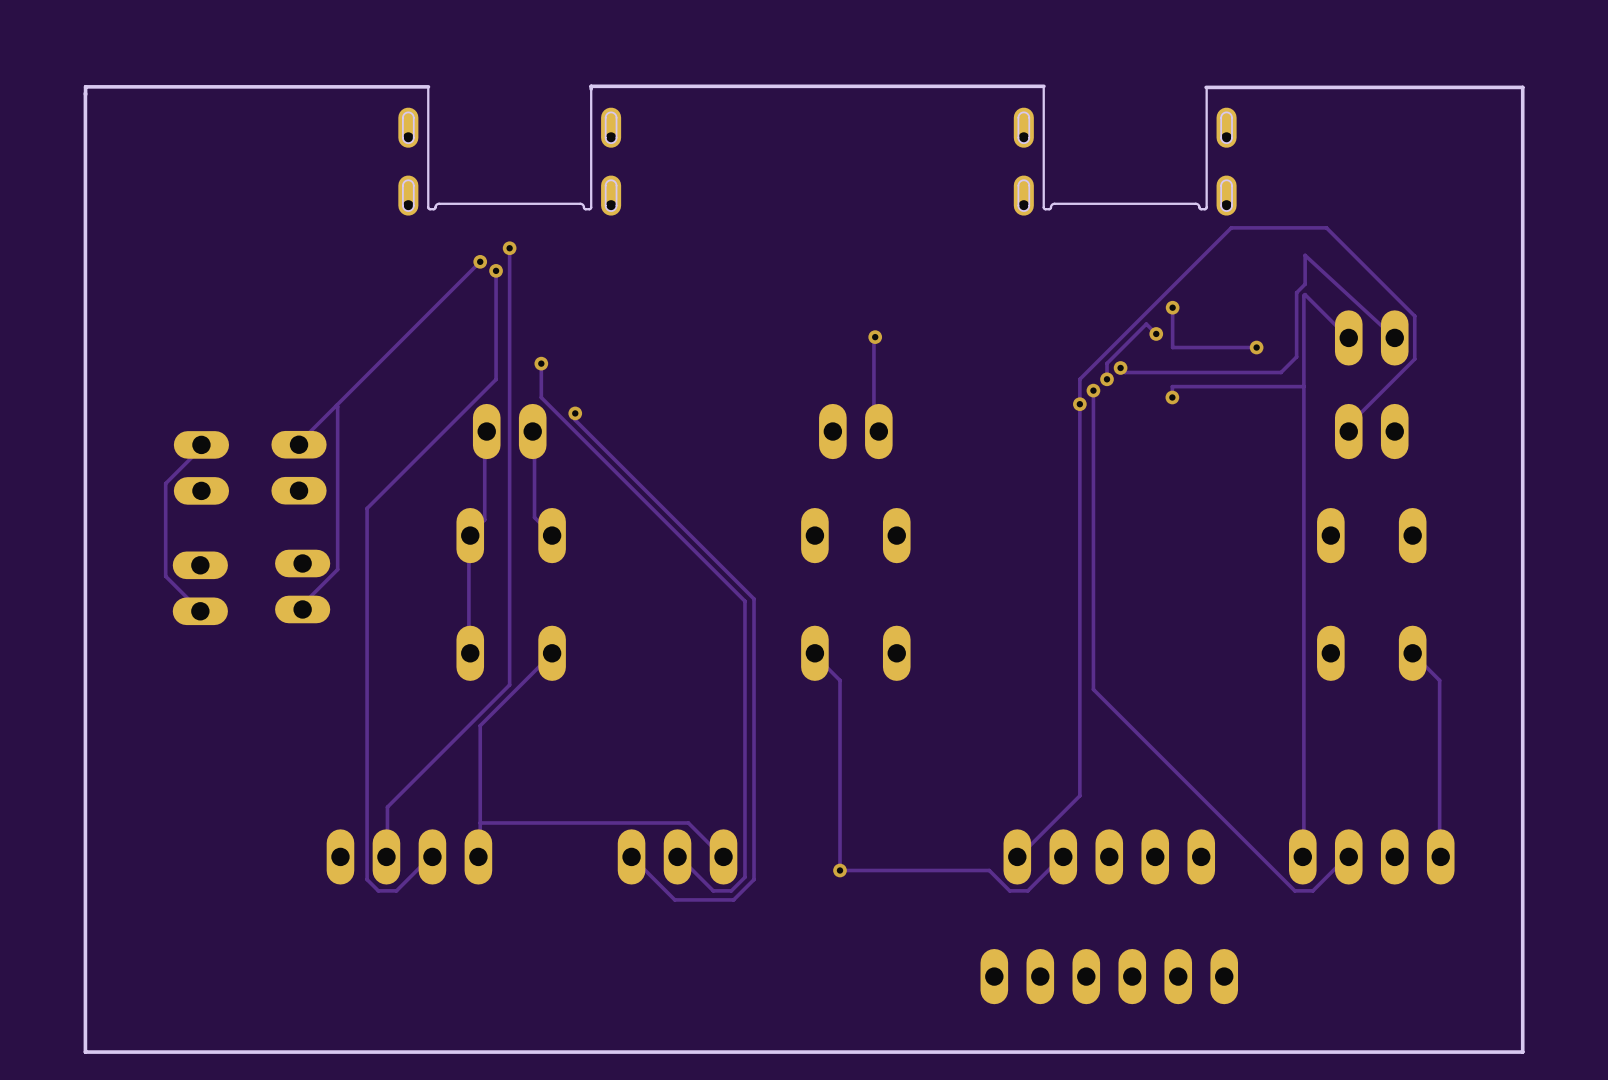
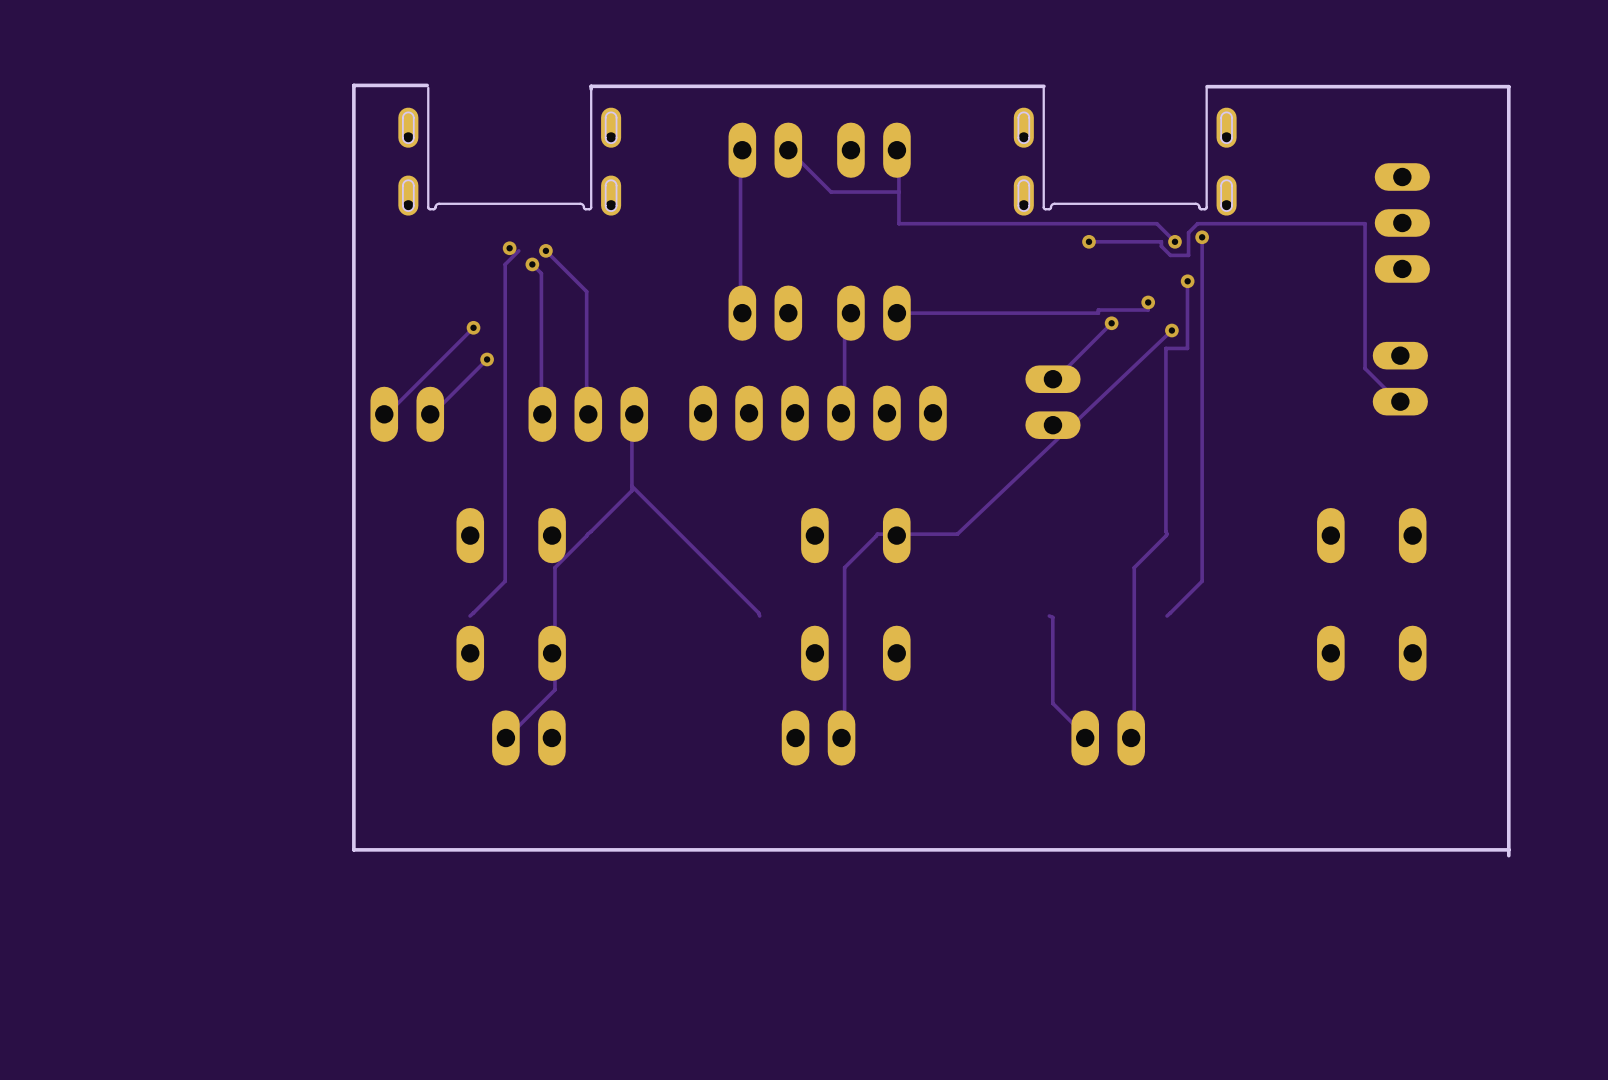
board edge: none -> (427, 85) (353, 85) (353, 849) (1508, 849)
board edge: (428, 86) (85, 86) (85, 94) -> none
board edge: none -> (1207, 86) (1508, 86) (1508, 855)
board edge: (1206, 87) (1522, 87) (1522, 1052) (85, 1052) (85, 93) -> none
track: none -> (742, 150) (740, 151) (740, 309) (742, 313)
part: none -> (765, 150)
track: none -> (788, 150) (831, 192) (898, 192)
part: none -> (873, 150)
track: none -> (896, 150) (898, 151) (898, 223) (1156, 223) (1174, 241)
part: none -> (1402, 222)
track: none -> (1202, 237) (1202, 581) (1167, 616)
via: none -> (1202, 237)
track: none -> (1089, 241) (1161, 241) (1161, 246) (1170, 255) (1188, 255) (1188, 232) (1197, 223) (1365, 223) (1365, 368) (1400, 401)
via: none -> (1089, 241)
via: none -> (1174, 241)
track: (509, 248) (509, 684) (387, 807) (386, 856) -> none
track: none -> (518, 250) (505, 264) (505, 581) (470, 616)
track: none -> (545, 250) (586, 291) (586, 413) (588, 414)
via: none -> (545, 250)
track: (480, 261) (299, 444) -> none
via: (480, 261) -> none
track: none -> (532, 264) (541, 273) (542, 414)
via: none -> (532, 264)
track: (496, 270) (496, 379) (367, 508) (367, 879) (378, 890) (396, 890) (432, 856) -> none
via: (496, 270) -> none
track: none -> (1187, 281) (1187, 348) (1165, 348) (1167, 534) (1134, 567) (1134, 735) (1131, 737)
via: none -> (1187, 281)
track: none -> (1148, 302) (1148, 310) (1098, 310) (1098, 313) (896, 313)
via: none -> (1148, 302)
track: (1172, 307) (1172, 347) (1256, 347) -> none
via: (1172, 307) -> none
part: none -> (765, 313)
track: none -> (850, 313) (844, 318) (844, 409) (841, 413)
part: none -> (873, 313)
track: none -> (1111, 323) (1057, 377) (1052, 379)
via: none -> (1111, 323)
track: none -> (473, 327) (387, 413) (384, 414)
via: none -> (473, 327)
track: none -> (1171, 330) (957, 534) (877, 534) (844, 567) (844, 735) (841, 737)
via: none -> (1171, 330)
track: (1156, 333) (1146, 324) (1107, 363) (1107, 379) -> none
via: (1156, 333) -> none
track: (875, 337) (873, 431) (878, 431) -> none
via: (875, 337) -> none
track: (1348, 337) (1305, 294) (1303, 295) (1302, 856) -> none
part: (1371, 337) -> none
track: (1394, 337) (1305, 255) (1305, 284) (1296, 292) (1296, 356) (1281, 372) (1125, 372) (1120, 367) -> none
via: (1256, 347) -> none
track: none -> (487, 359) (430, 414)
via: none -> (487, 359)
track: (541, 363) (541, 397) (744, 601) (744, 877) (731, 890) (713, 890) (677, 856) -> none
via: (541, 363) -> none
via: (1120, 367) -> none
part: none -> (1400, 378)
via: (1107, 379) -> none
track: (1303, 386) (1172, 386) (1172, 397) -> none
track: (1093, 390) (1093, 689) (1294, 890) (1312, 890) (1348, 856) -> none
via: (1093, 390) -> none
via: (1172, 397) -> none
part: none -> (1052, 402)
via: (1079, 404) -> none
track: (336, 405) (337, 569) (303, 603) (302, 609) -> none
track: (575, 413) (575, 420) (754, 598) (754, 879) (733, 899) (674, 899) (631, 856) -> none
via: (575, 413) -> none
part: none -> (818, 413)
part: none -> (407, 414)
track: none -> (634, 414) (631, 418) (631, 490) (554, 567) (554, 689) (505, 737)
track: (486, 431) (484, 431) (484, 519) (468, 535) (470, 653) -> none
part: (509, 431) -> none
track: (532, 431) (534, 431) (534, 517) (552, 535) -> none
part: (855, 431) -> none
track: (1348, 431) (1349, 424) (1414, 359) (1414, 316) (1326, 227) (1231, 227) (1079, 379) (1079, 795) (1017, 856) -> none
part: (1371, 431) -> none
track: (201, 444) (199, 445) (199, 449) (165, 483) (165, 576) (200, 611) -> none
part: (201, 467) -> none
part: (299, 467) -> none
track: none -> (631, 486) (759, 616)
part: (302, 586) -> none
part: (200, 588) -> none
track: none -> (1049, 616) (1052, 617) (1052, 703) (1085, 737)
track: (552, 653) (480, 725) (480, 856) (478, 856) -> none
track: (814, 653) (840, 680) (840, 870) (989, 870) (1009, 890) (1027, 890) (1063, 856) -> none
track: (1412, 653) (1439, 680) (1440, 856) -> none
part: none -> (528, 737)
part: none -> (818, 737)
part: none -> (1108, 737)
track: (480, 822) (688, 822) (723, 856) -> none
part: (409, 856) -> none
part position: (677, 856) -> (588, 414)
part: (1109, 856) -> none
part: (1371, 856) -> none
via: (840, 870) -> none
part: (1109, 976) -> none

